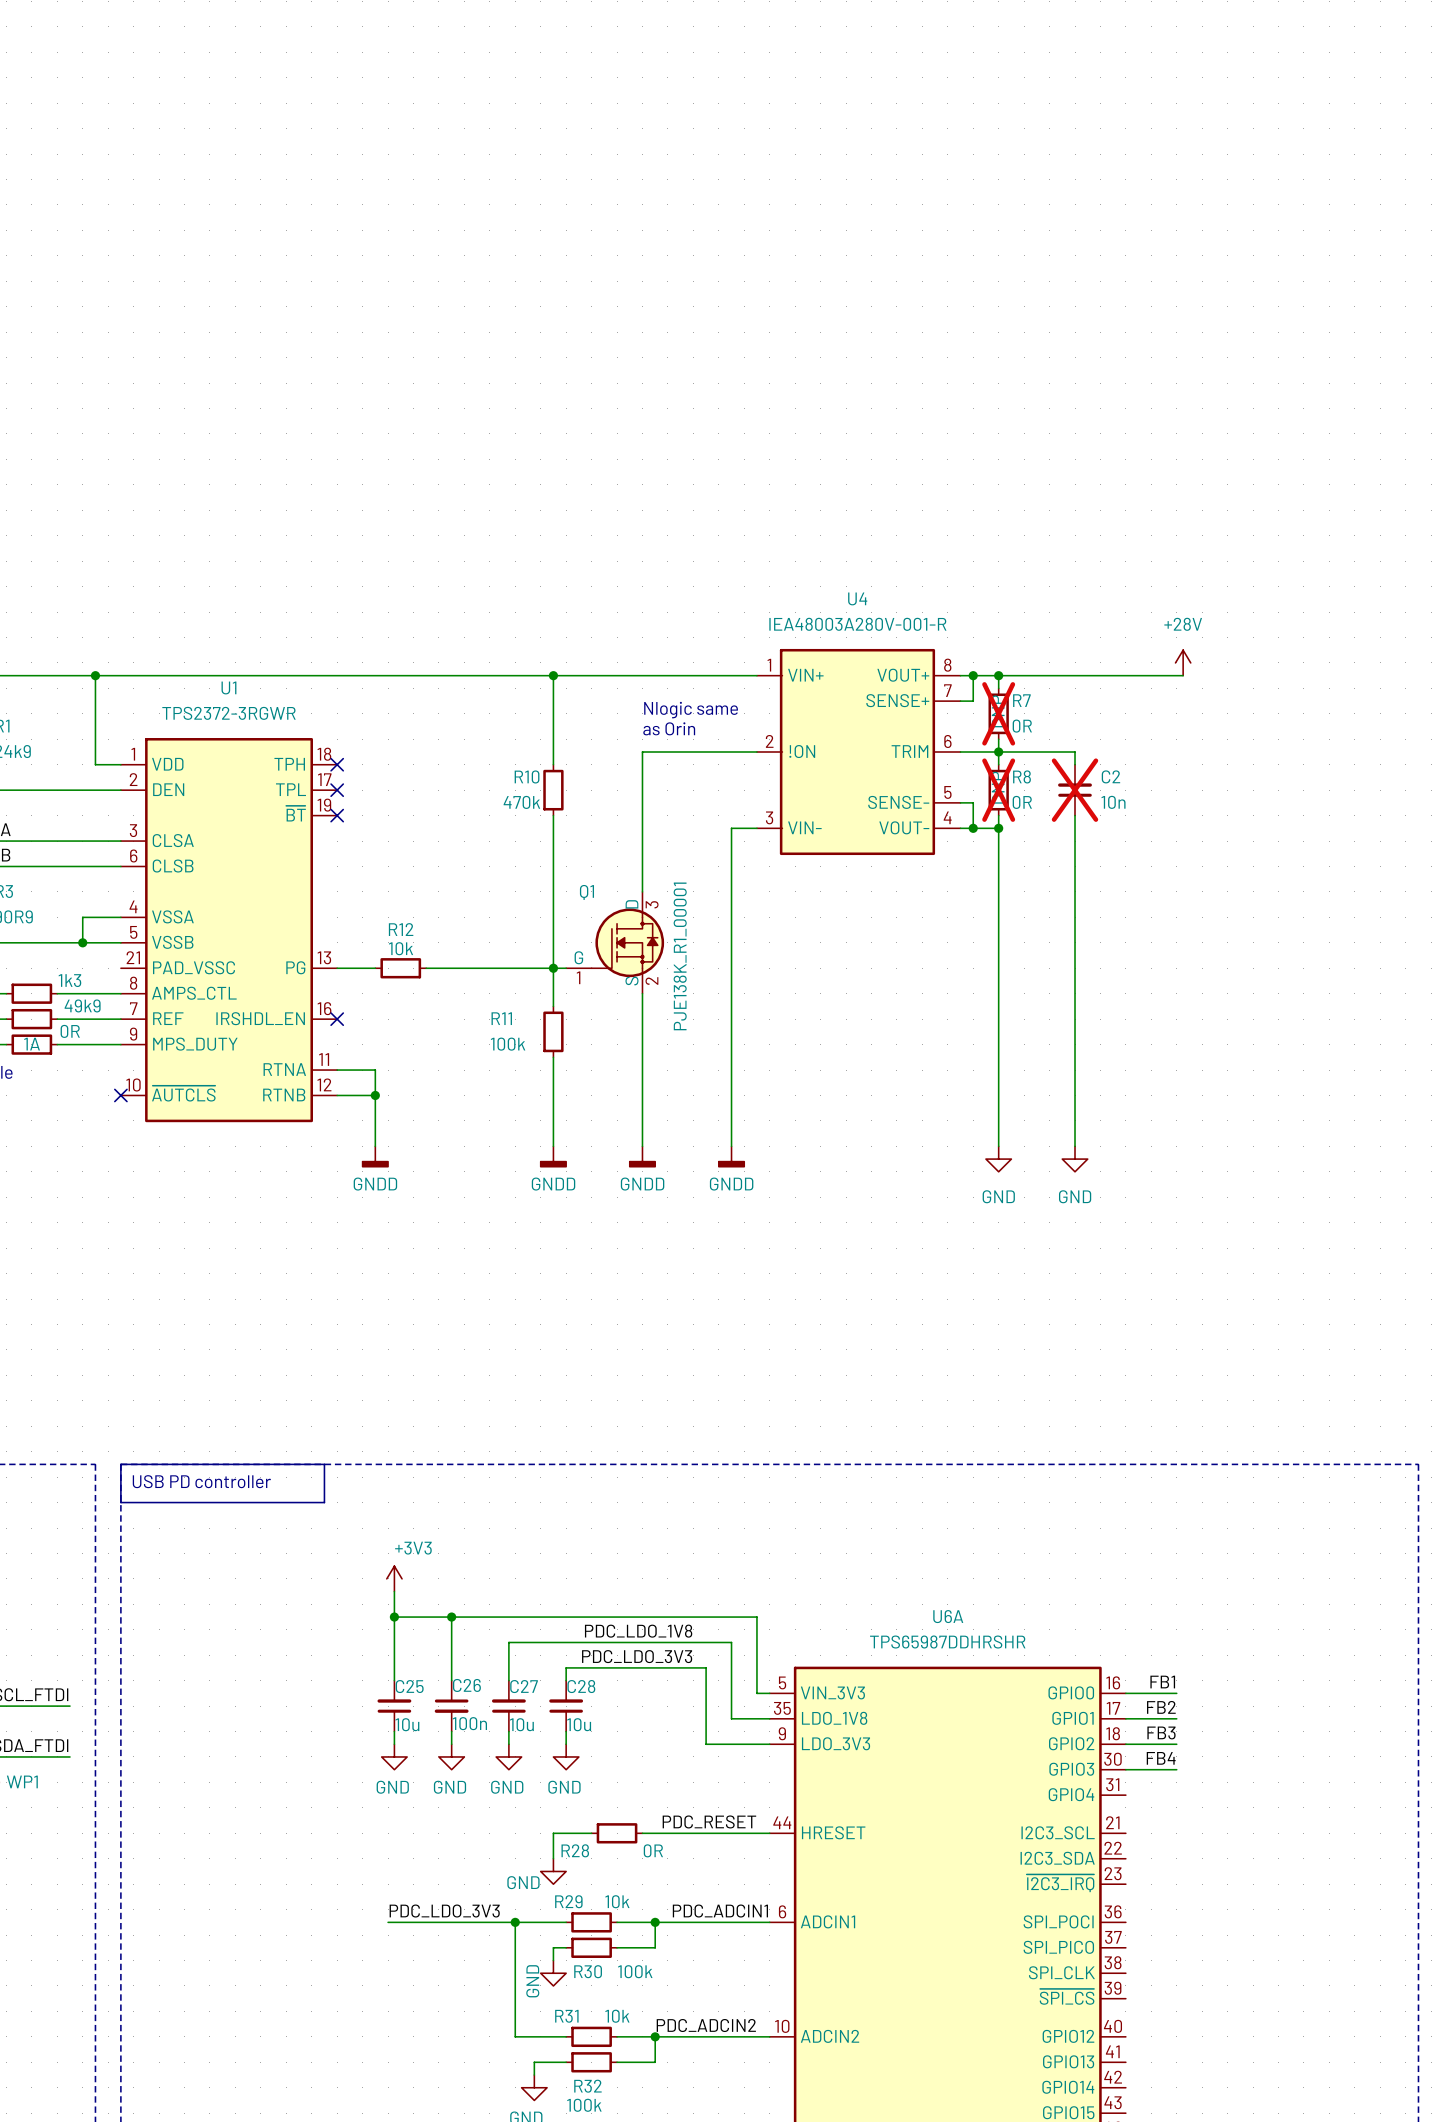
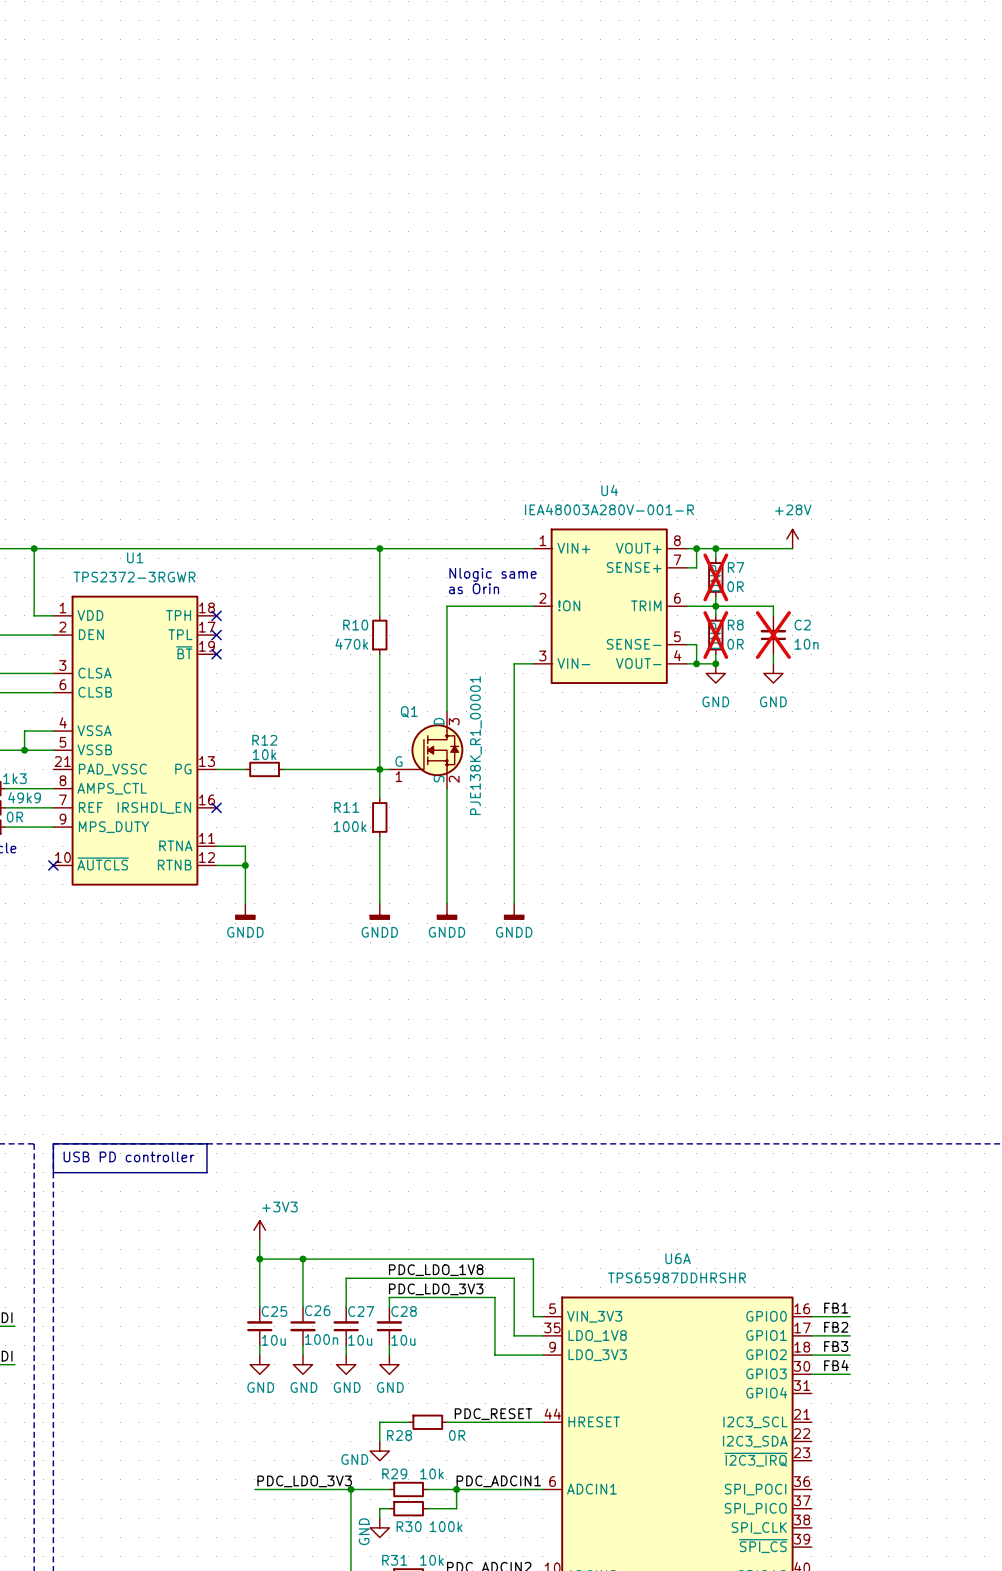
power symbol position: +28V (1183, 662) -> +28V (792, 539)
wire: (1100, 675) (1183, 675) -> none
wire: (998, 828) (998, 1146) -> none
wire: (1075, 828) (1075, 1146) -> none
power symbol: none -> GND (715, 673)
power symbol: none -> GND (773, 673)
power symbol: GND (998, 1159) -> none
power symbol: GND (1075, 1159) -> none

